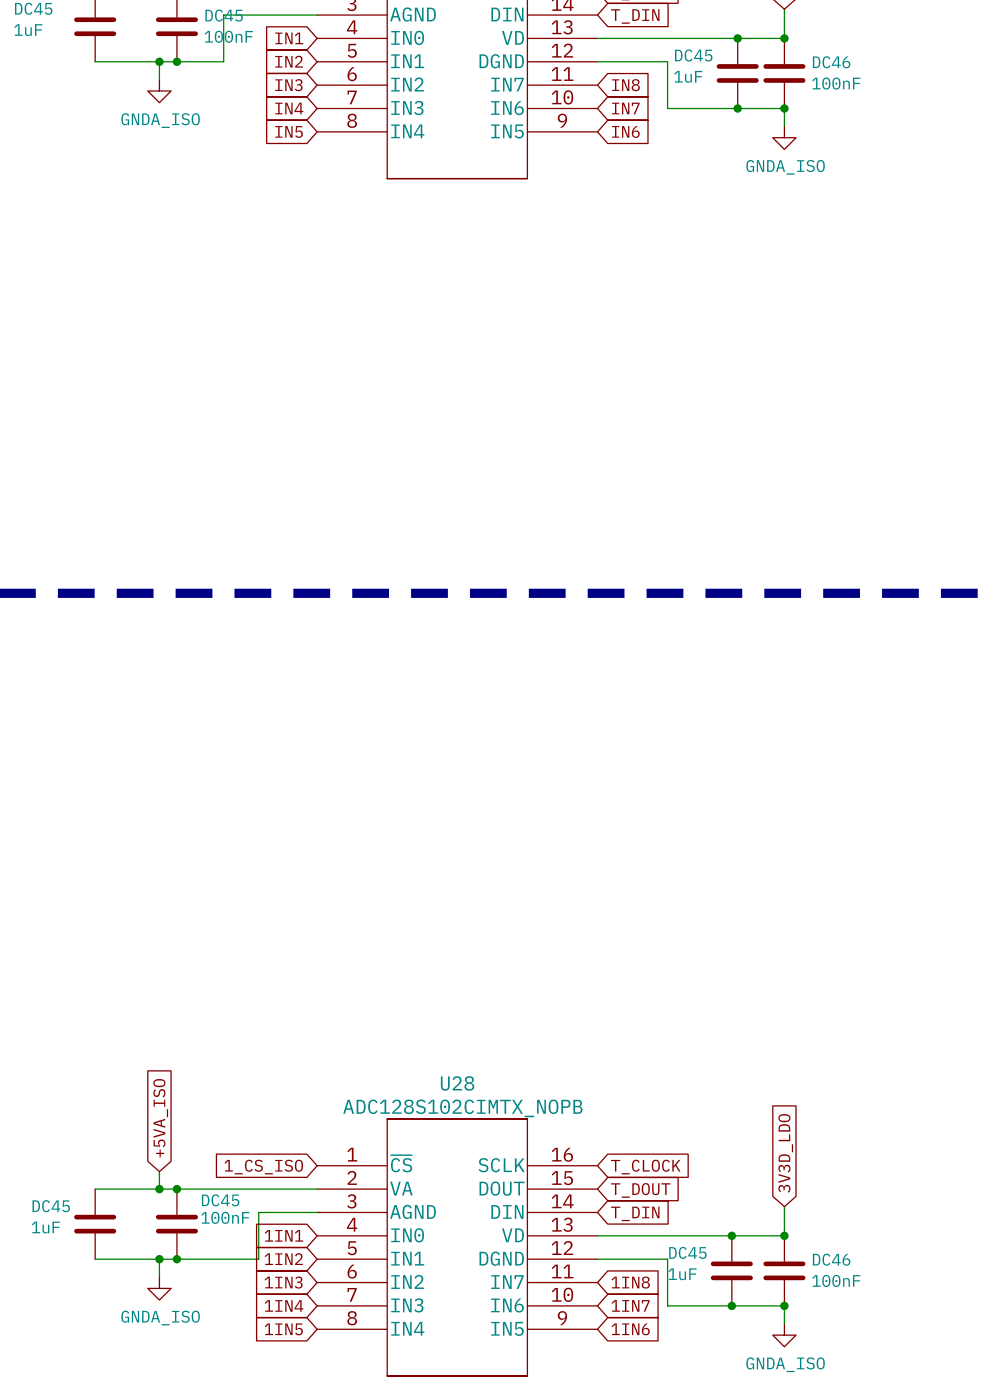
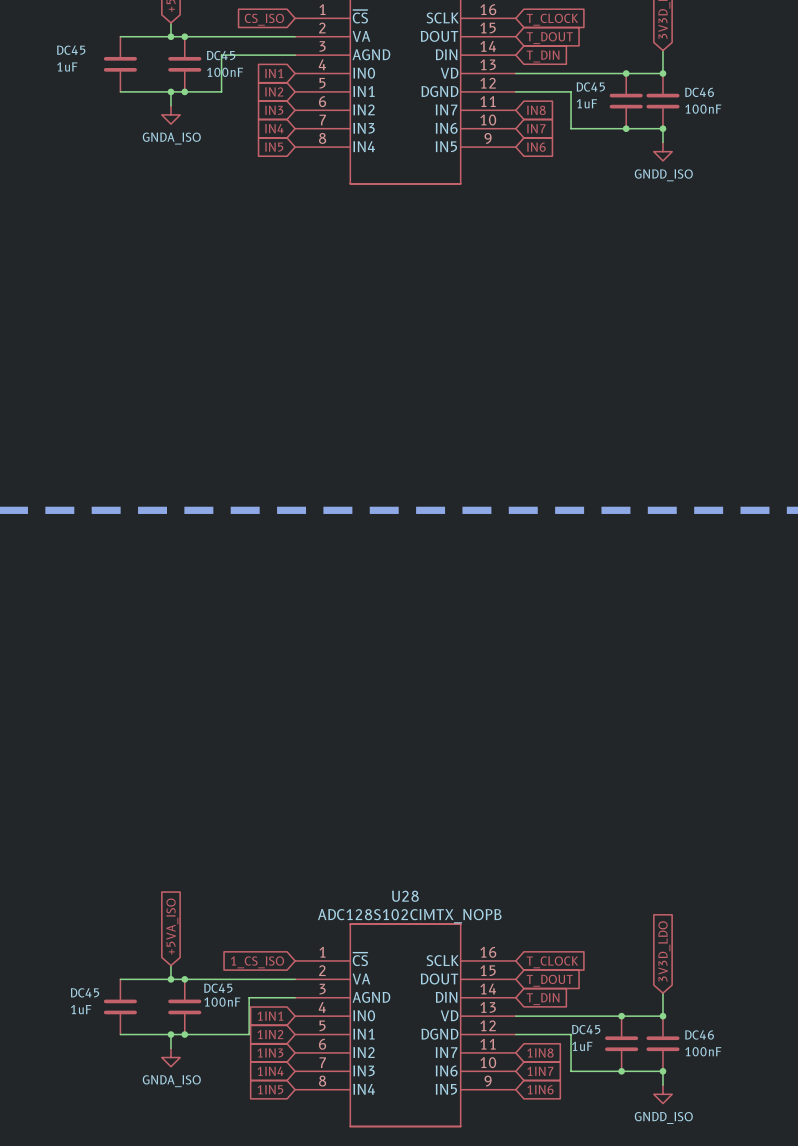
power symbol: GNDA_ISO (784, 137) -> GNDD_ISO (662, 151)
power symbol: GNDA_ISO (784, 1335) -> GNDD_ISO (662, 1094)

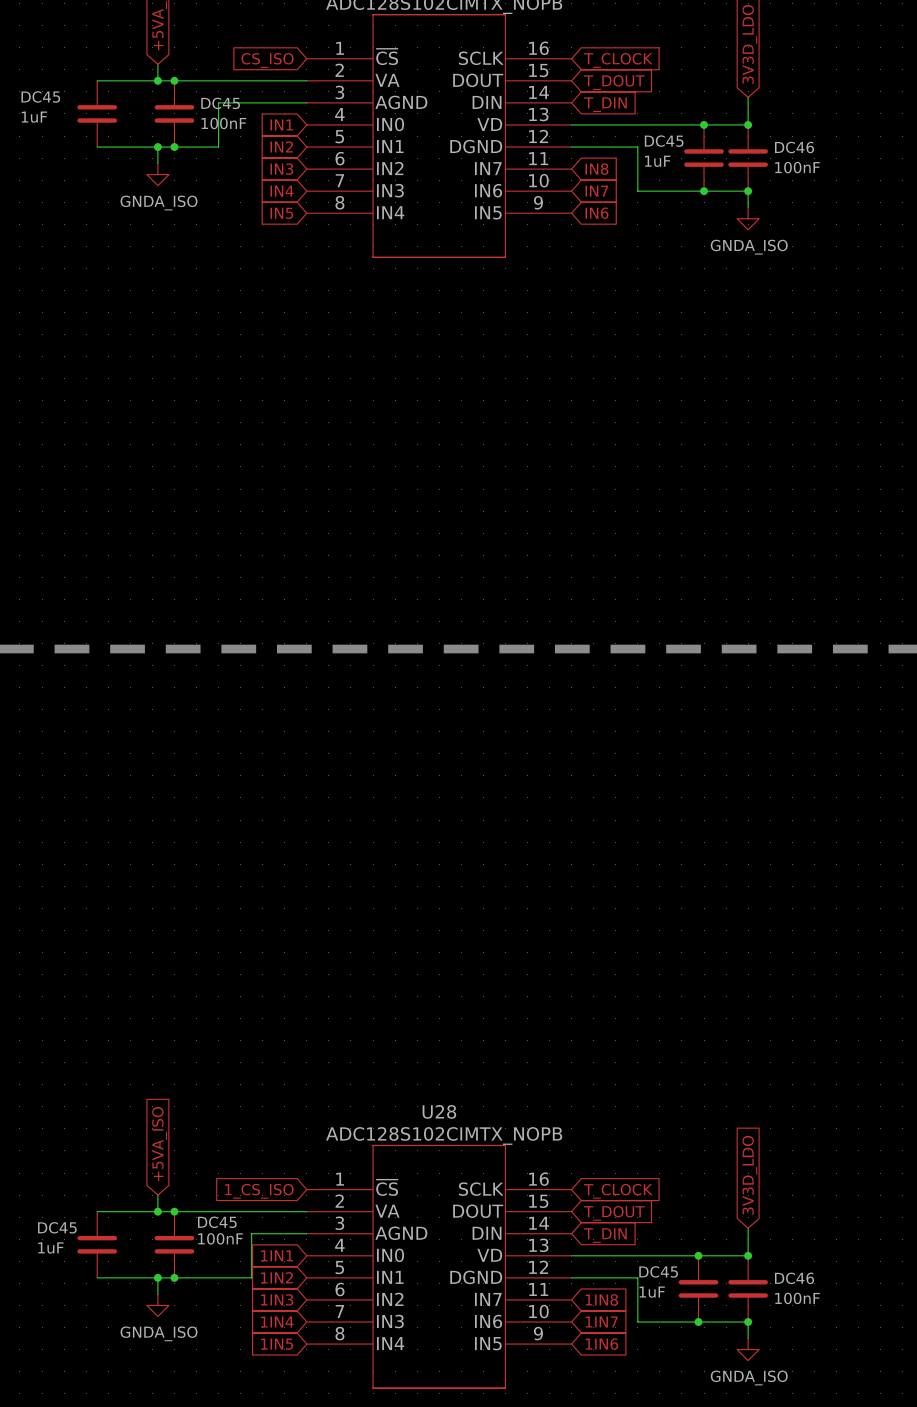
power symbol: GNDD_ISO (662, 151) -> GNDA_ISO (748, 218)
power symbol: GNDD_ISO (662, 1094) -> GNDA_ISO (748, 1349)

